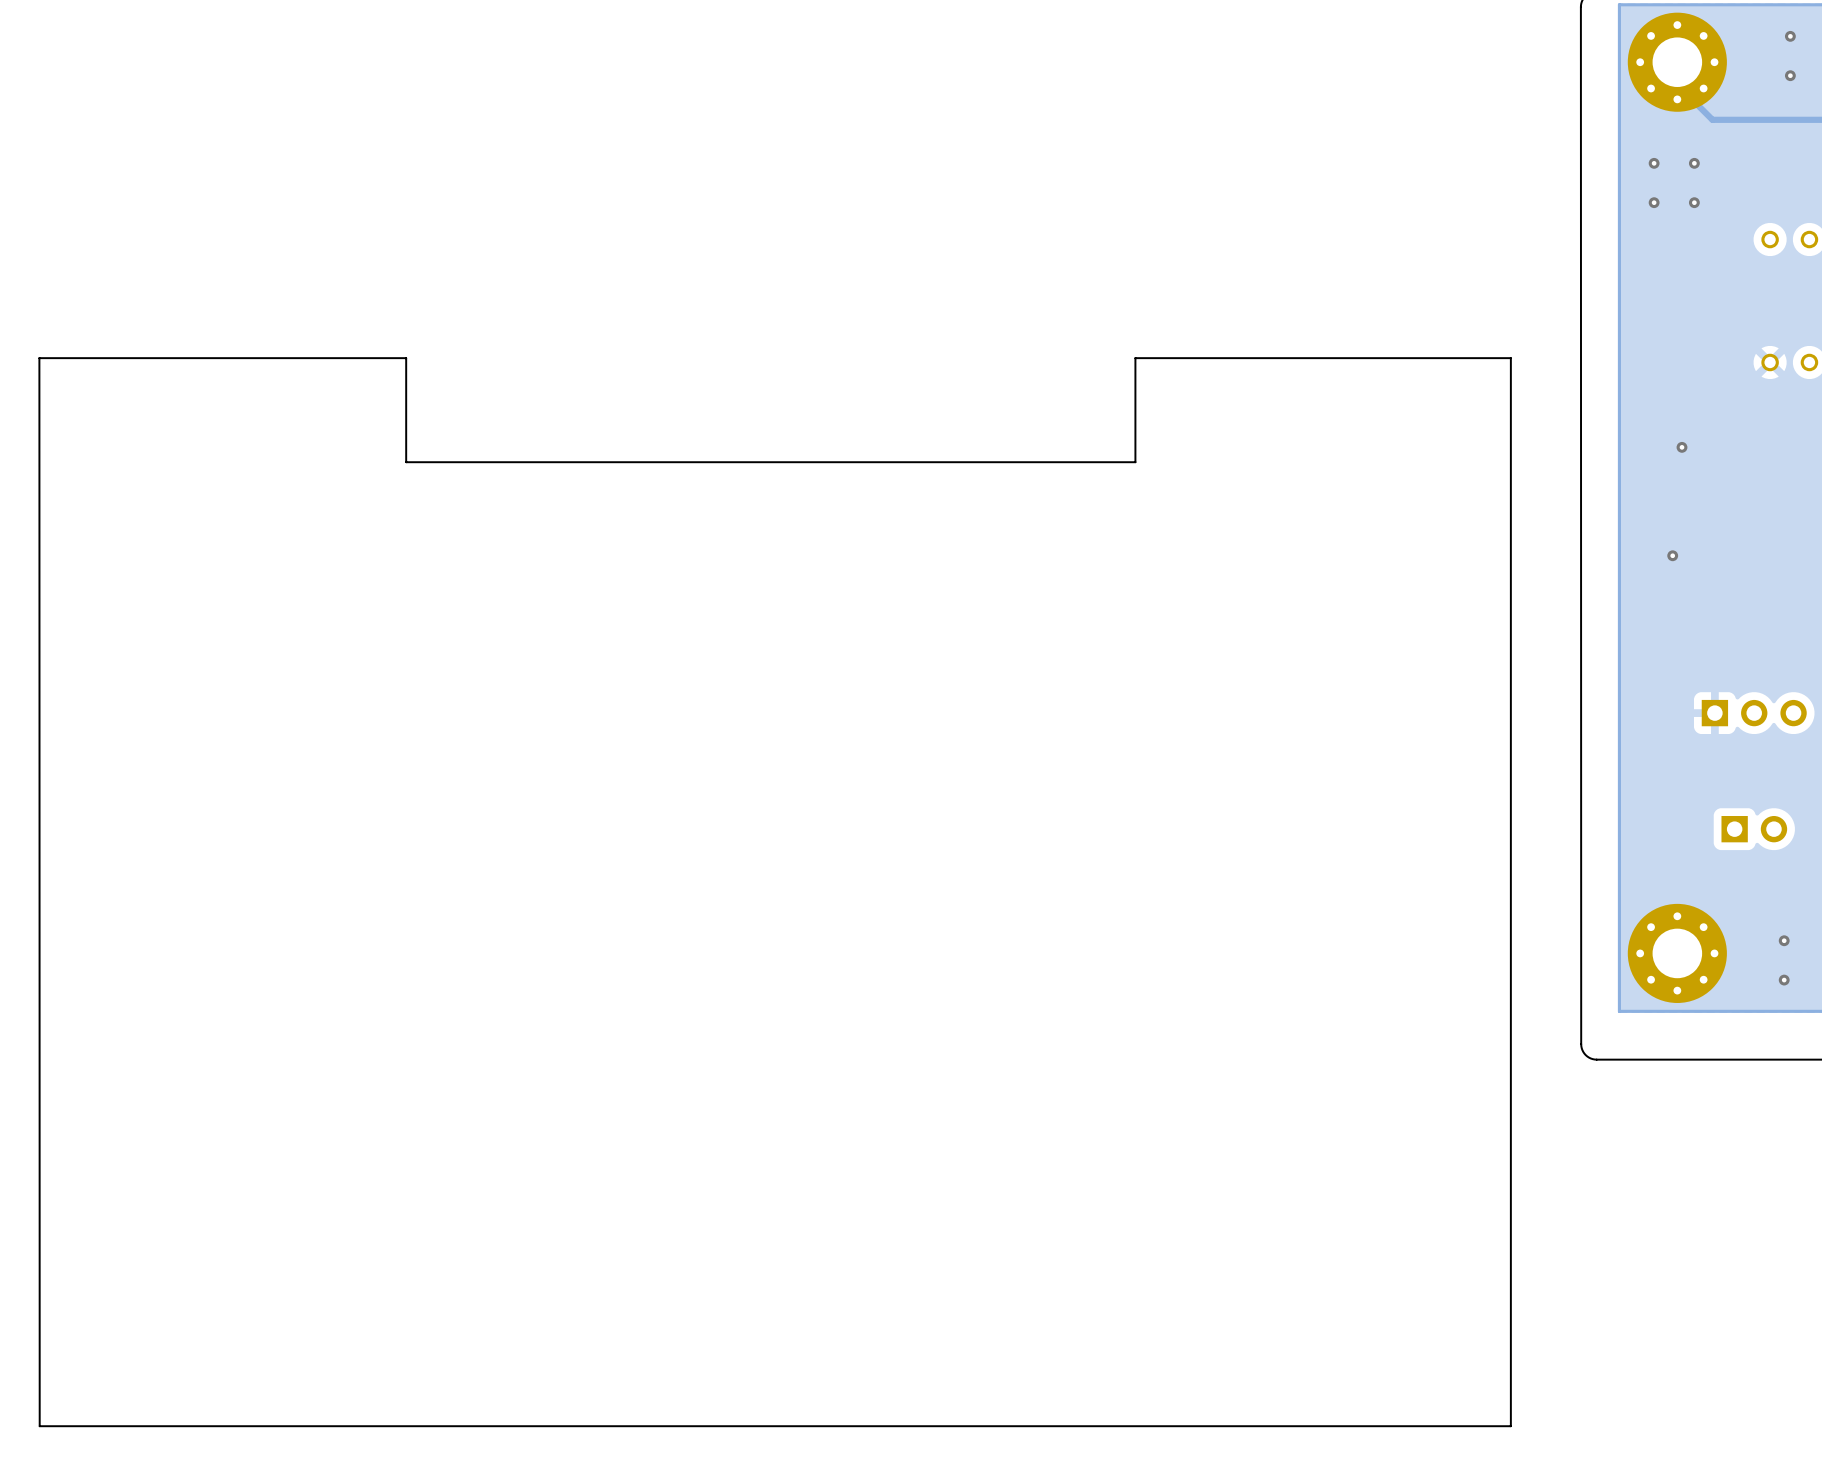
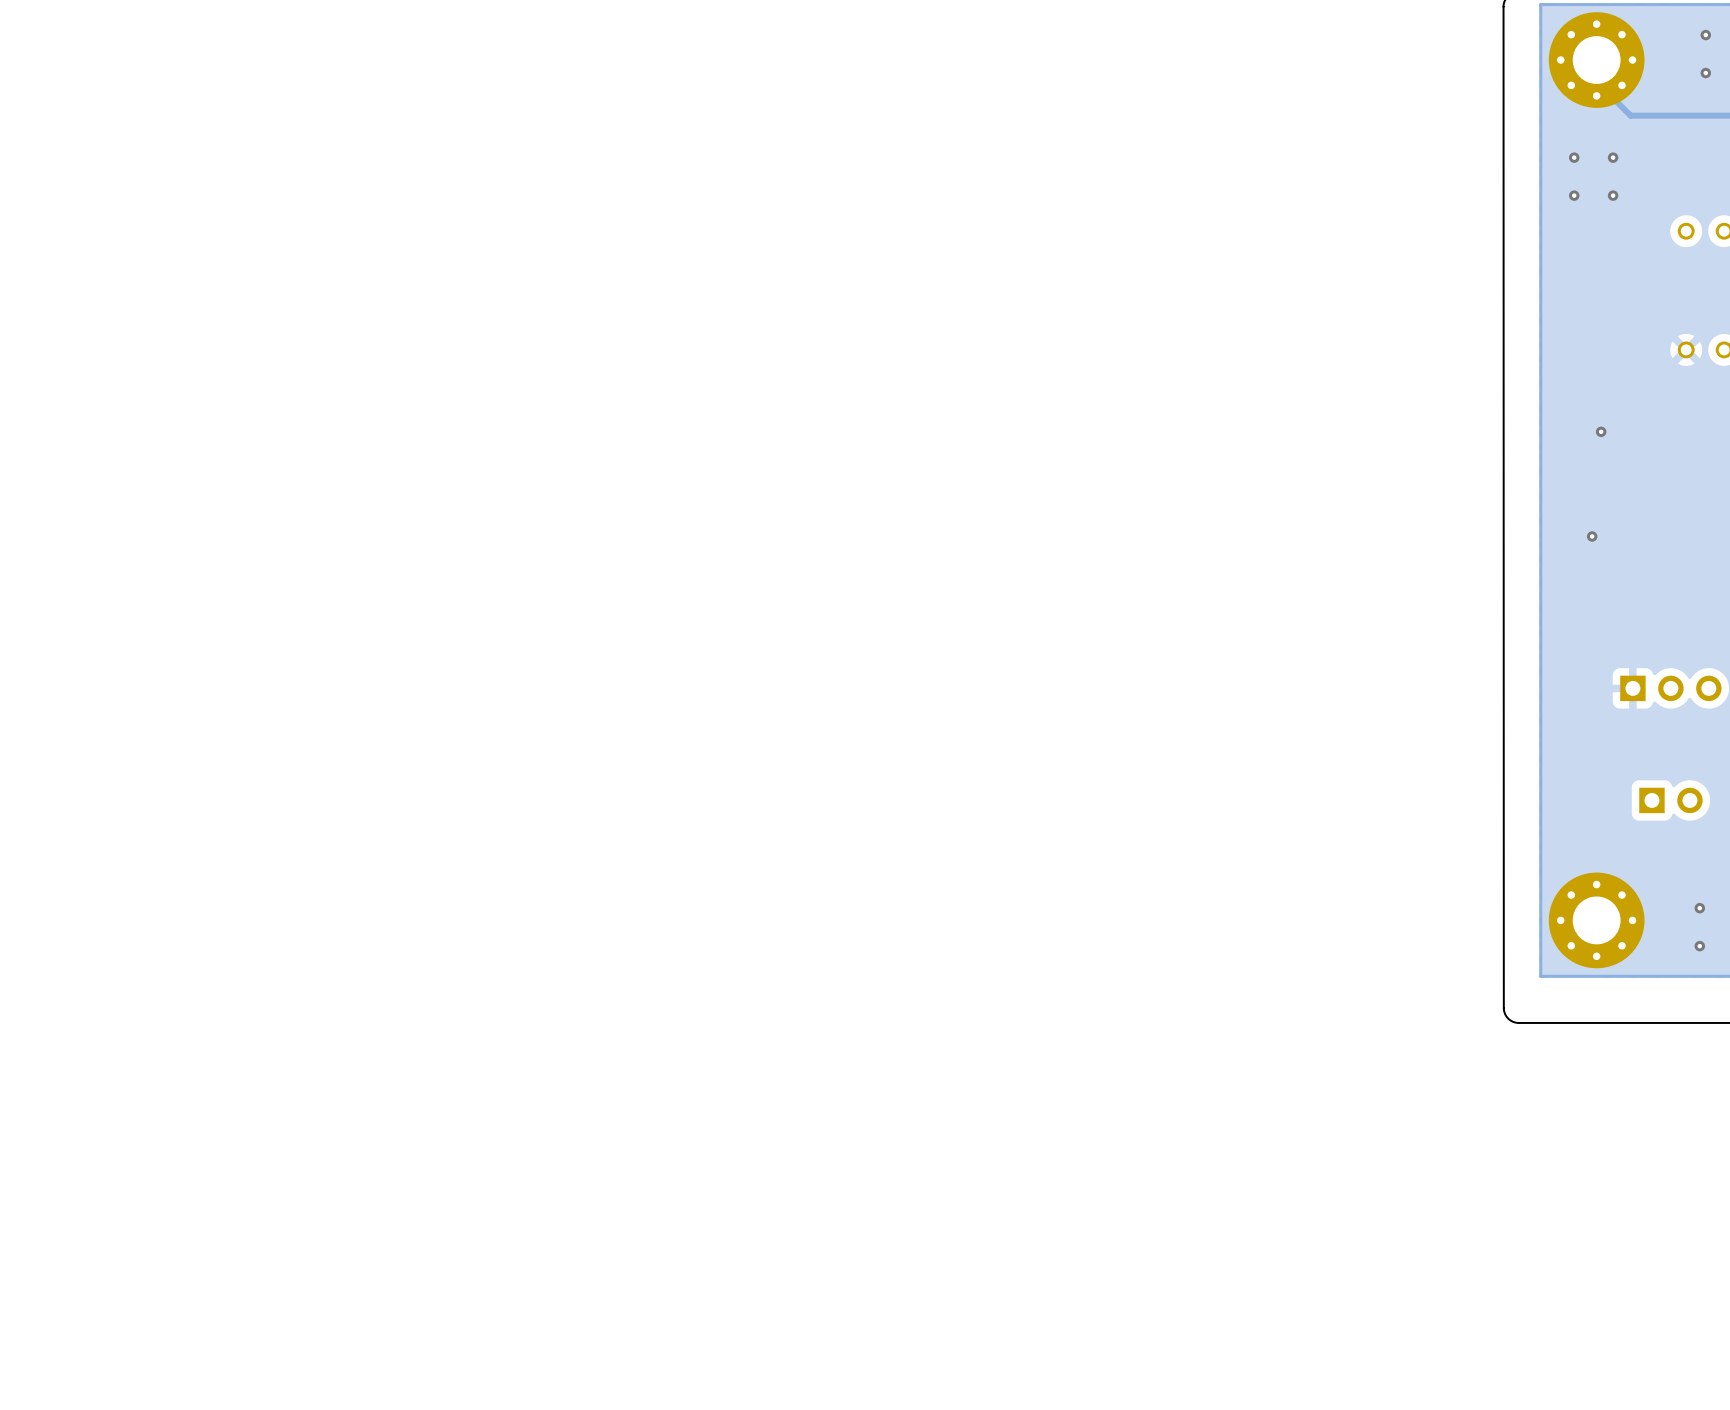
board edge: (1510, 358) (1135, 358) (1135, 462) (406, 462) (406, 358) (39, 358) (39, 1426) (1510, 1426) (1510, 358) -> none

